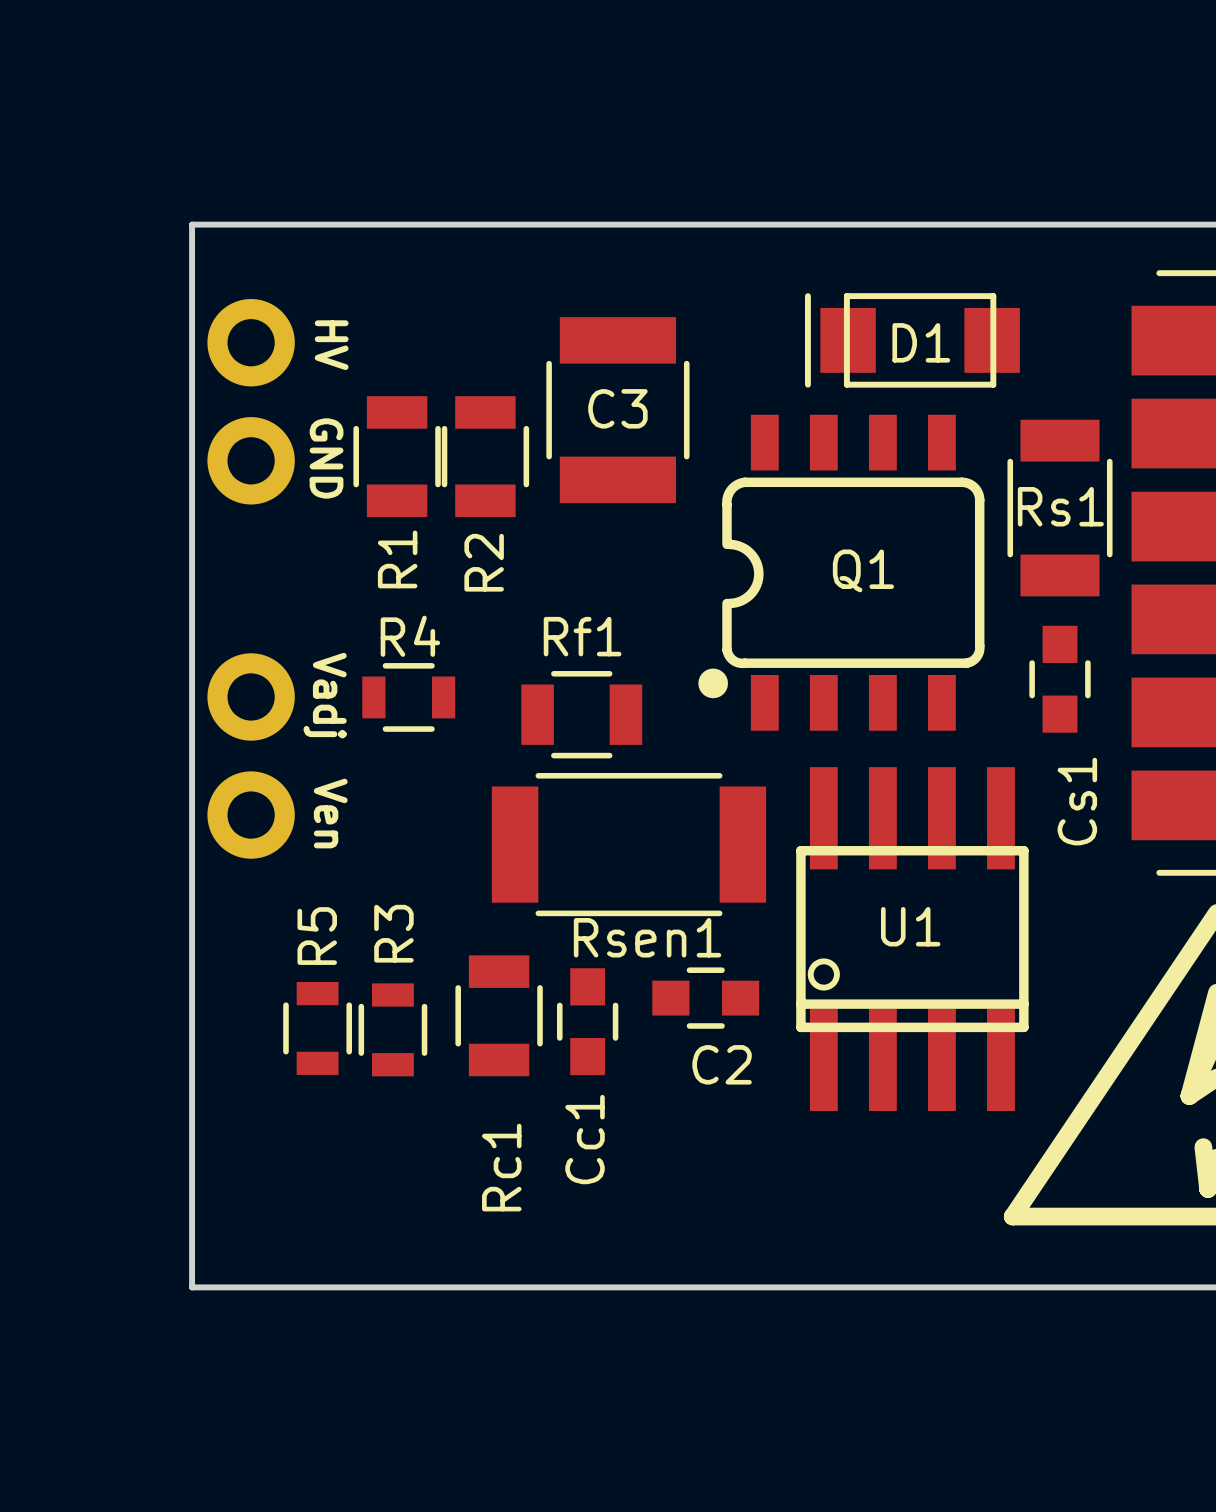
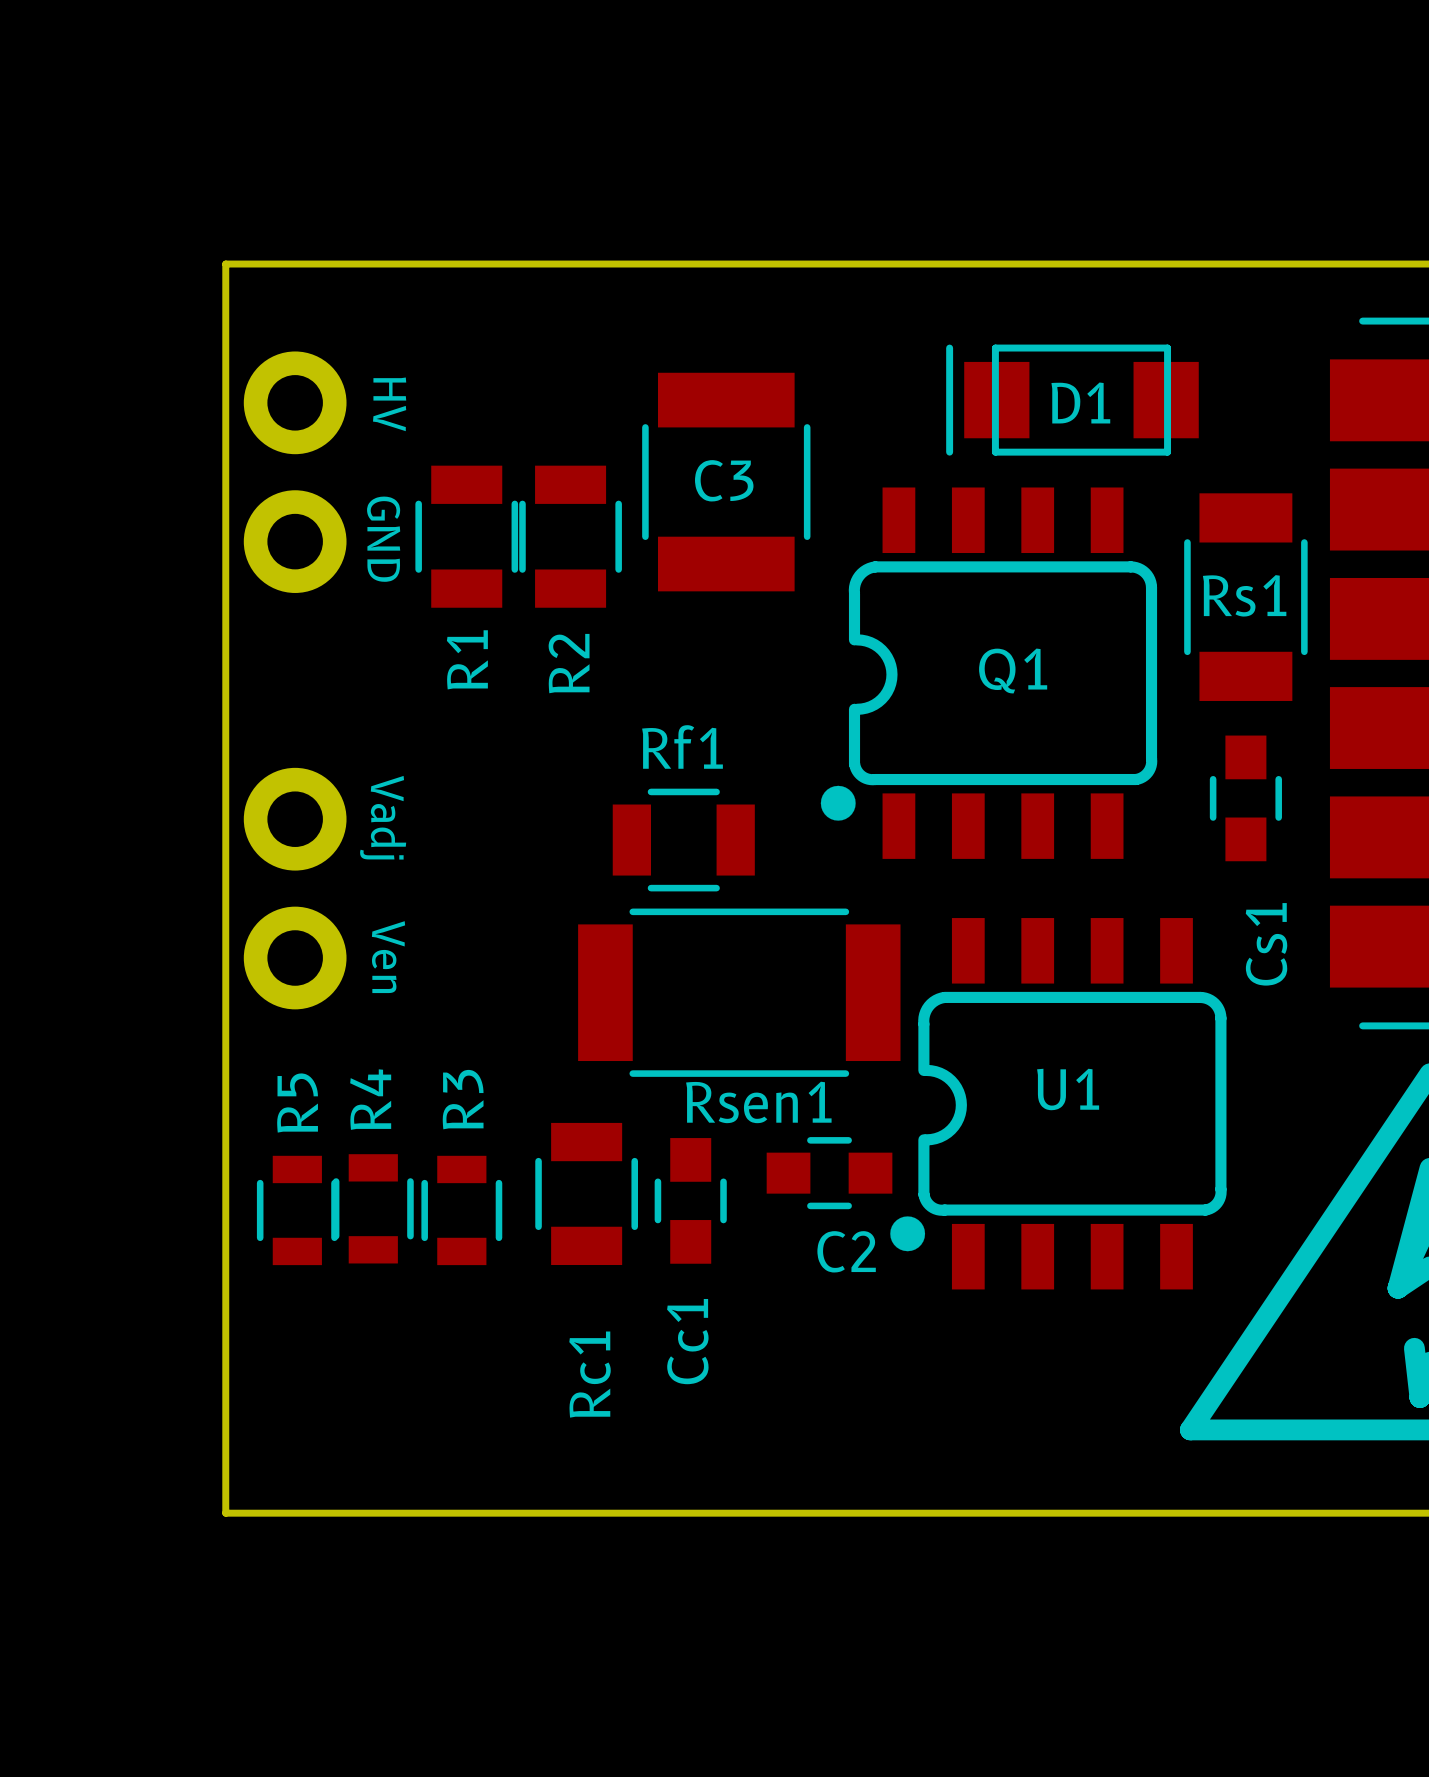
R4: (408, 697) -> none
U1 footprint: [796, 767, 1029, 1111] -> [890, 918, 1227, 1290]
R5 name: R5 (317, 936) -> R4 (370, 1099)
R5: none -> (297, 1210)

